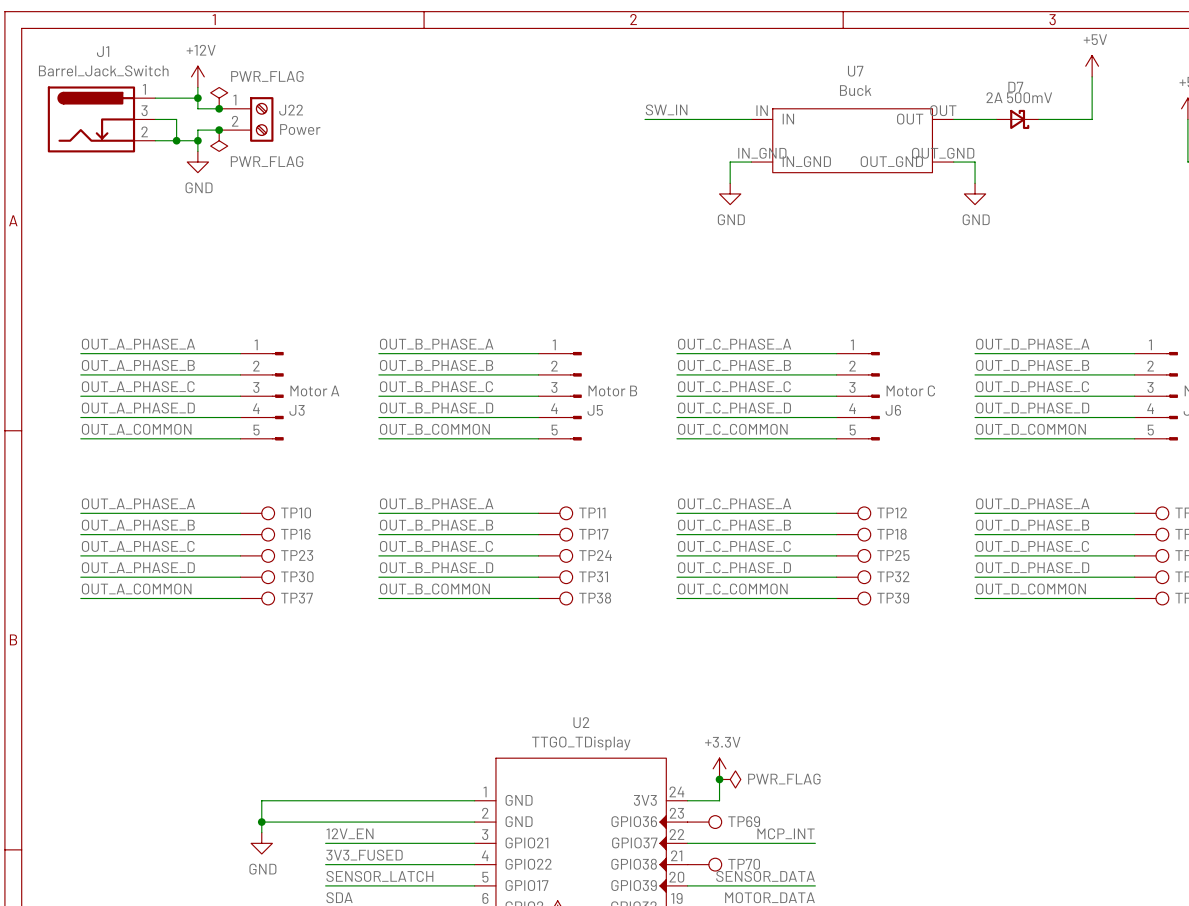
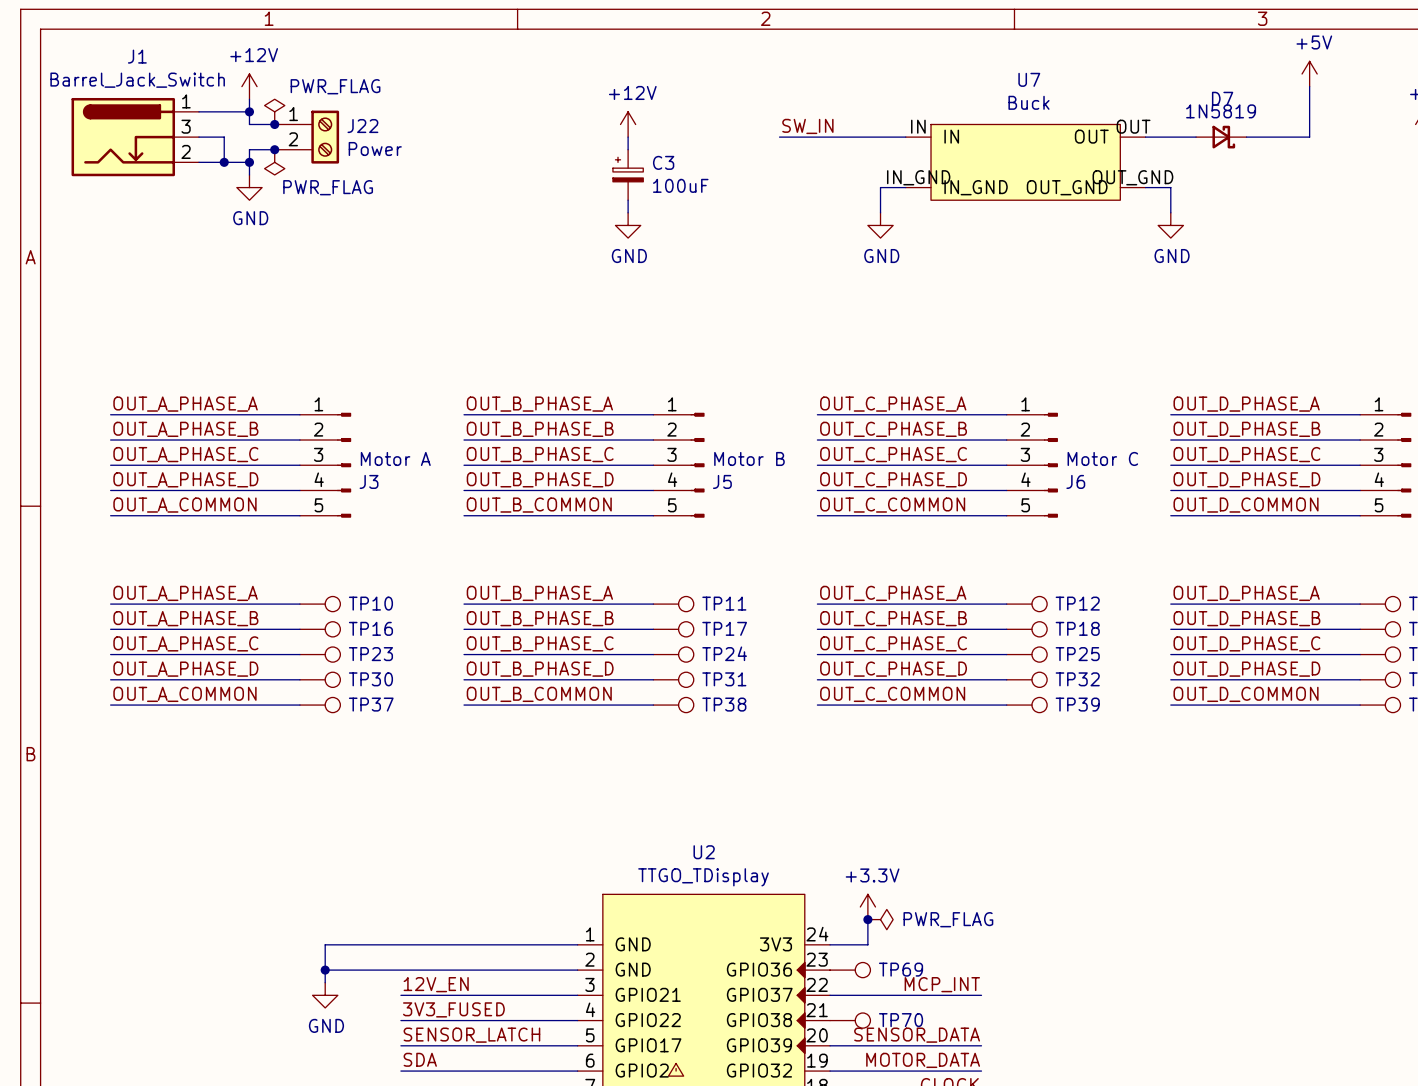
D7 value: 2A 500mV (1019, 97) -> 1N5819 (1221, 111)
power symbol: none -> +12V (628, 124)
wire: none -> (628, 137) (628, 149)
C3: none -> 100uF (628, 174)
wire: none -> (628, 200) (628, 212)
power symbol: none -> GND (628, 225)

